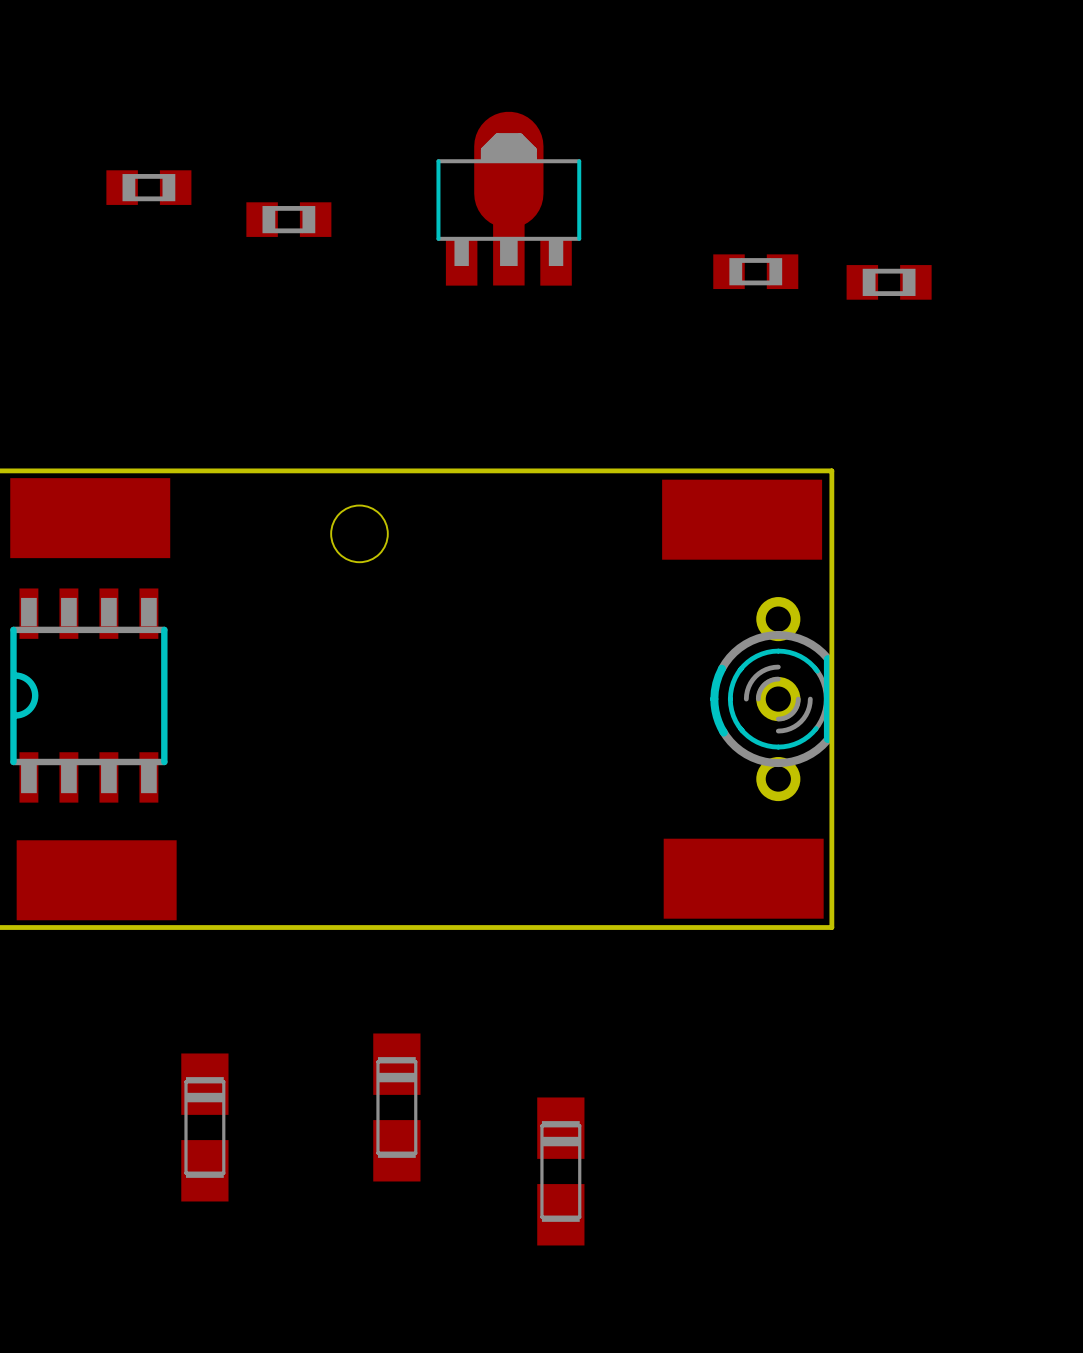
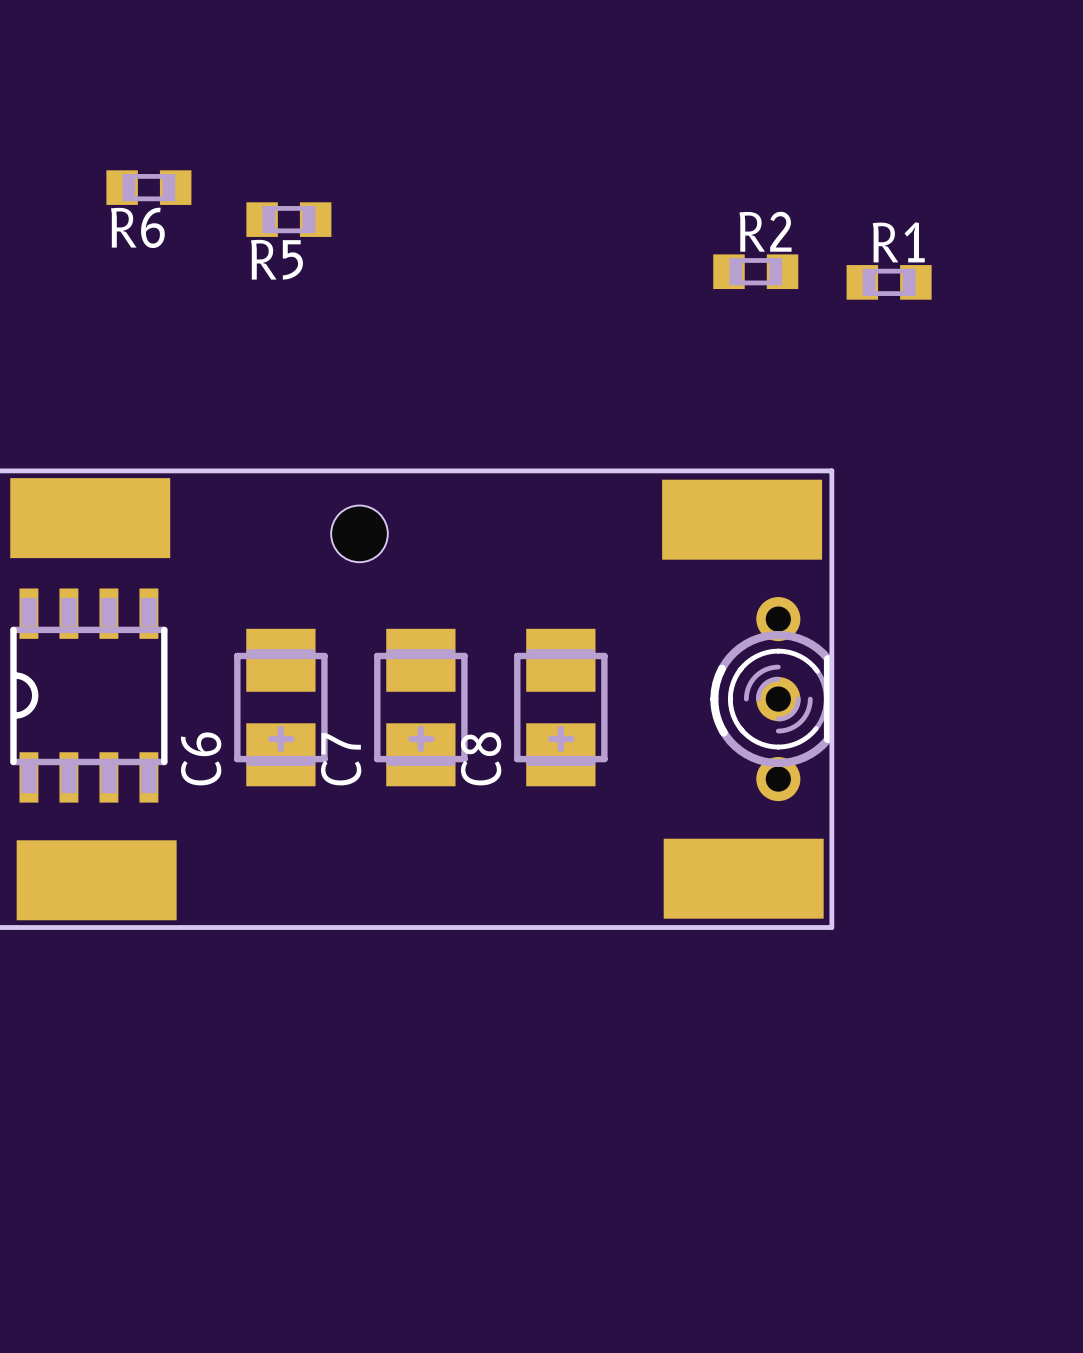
part: (508, 198) -> none
R6 name: none -> R6 (137, 227)
R2 name: none -> R2 (765, 231)
R1 name: none -> R1 (898, 242)
R5 name: none -> R5 (276, 259)
C6: none -> (280, 707)
C7: none -> (420, 707)
C8: none -> (560, 707)
part: (396, 1107) -> none
part: (204, 1127) -> none
part: (560, 1171) -> none

